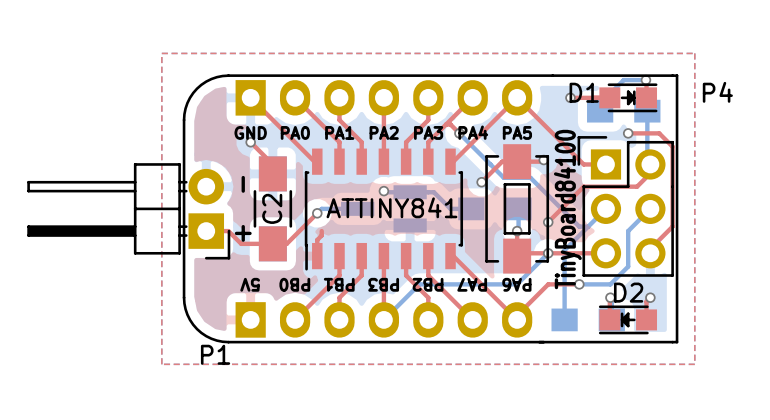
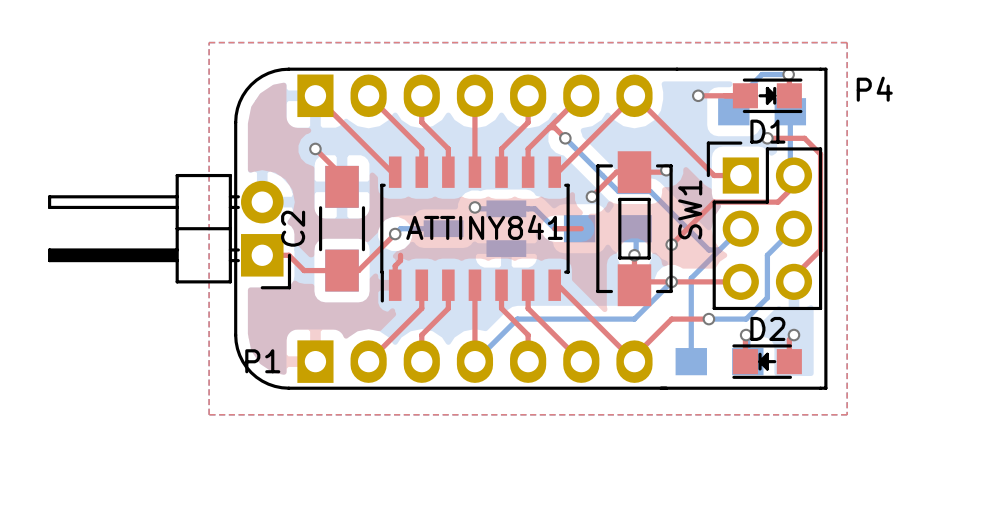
D1 name position: D1 (584, 92) -> D1 (767, 131)
text: GND (250, 132) -> none
text: PA0 (295, 132) -> none
text: PA1 (339, 132) -> none
text: PA2 (384, 132) -> none
text: PA3 (428, 132) -> none
text: PA4 (473, 132) -> none
text: PA5 (517, 132) -> none
SW1 name: none -> SW1 (690, 209)
text: + - (243, 208) -> none
C2 name position: C2 (272, 208) -> C2 (293, 228)
top track: none -> (554, 228) (581, 228)
text: TinyBoard84100 (567, 209) -> none
text: 5V (250, 284) -> none
text: PB0 (294, 284) -> none
text: PB1 (339, 284) -> none
text: PB3 (383, 284) -> none
text: PB2 (428, 284) -> none
text: PA7 (472, 284) -> none
text: PA6 (516, 284) -> none
P1 name position: P1 (215, 354) -> P1 (262, 361)

